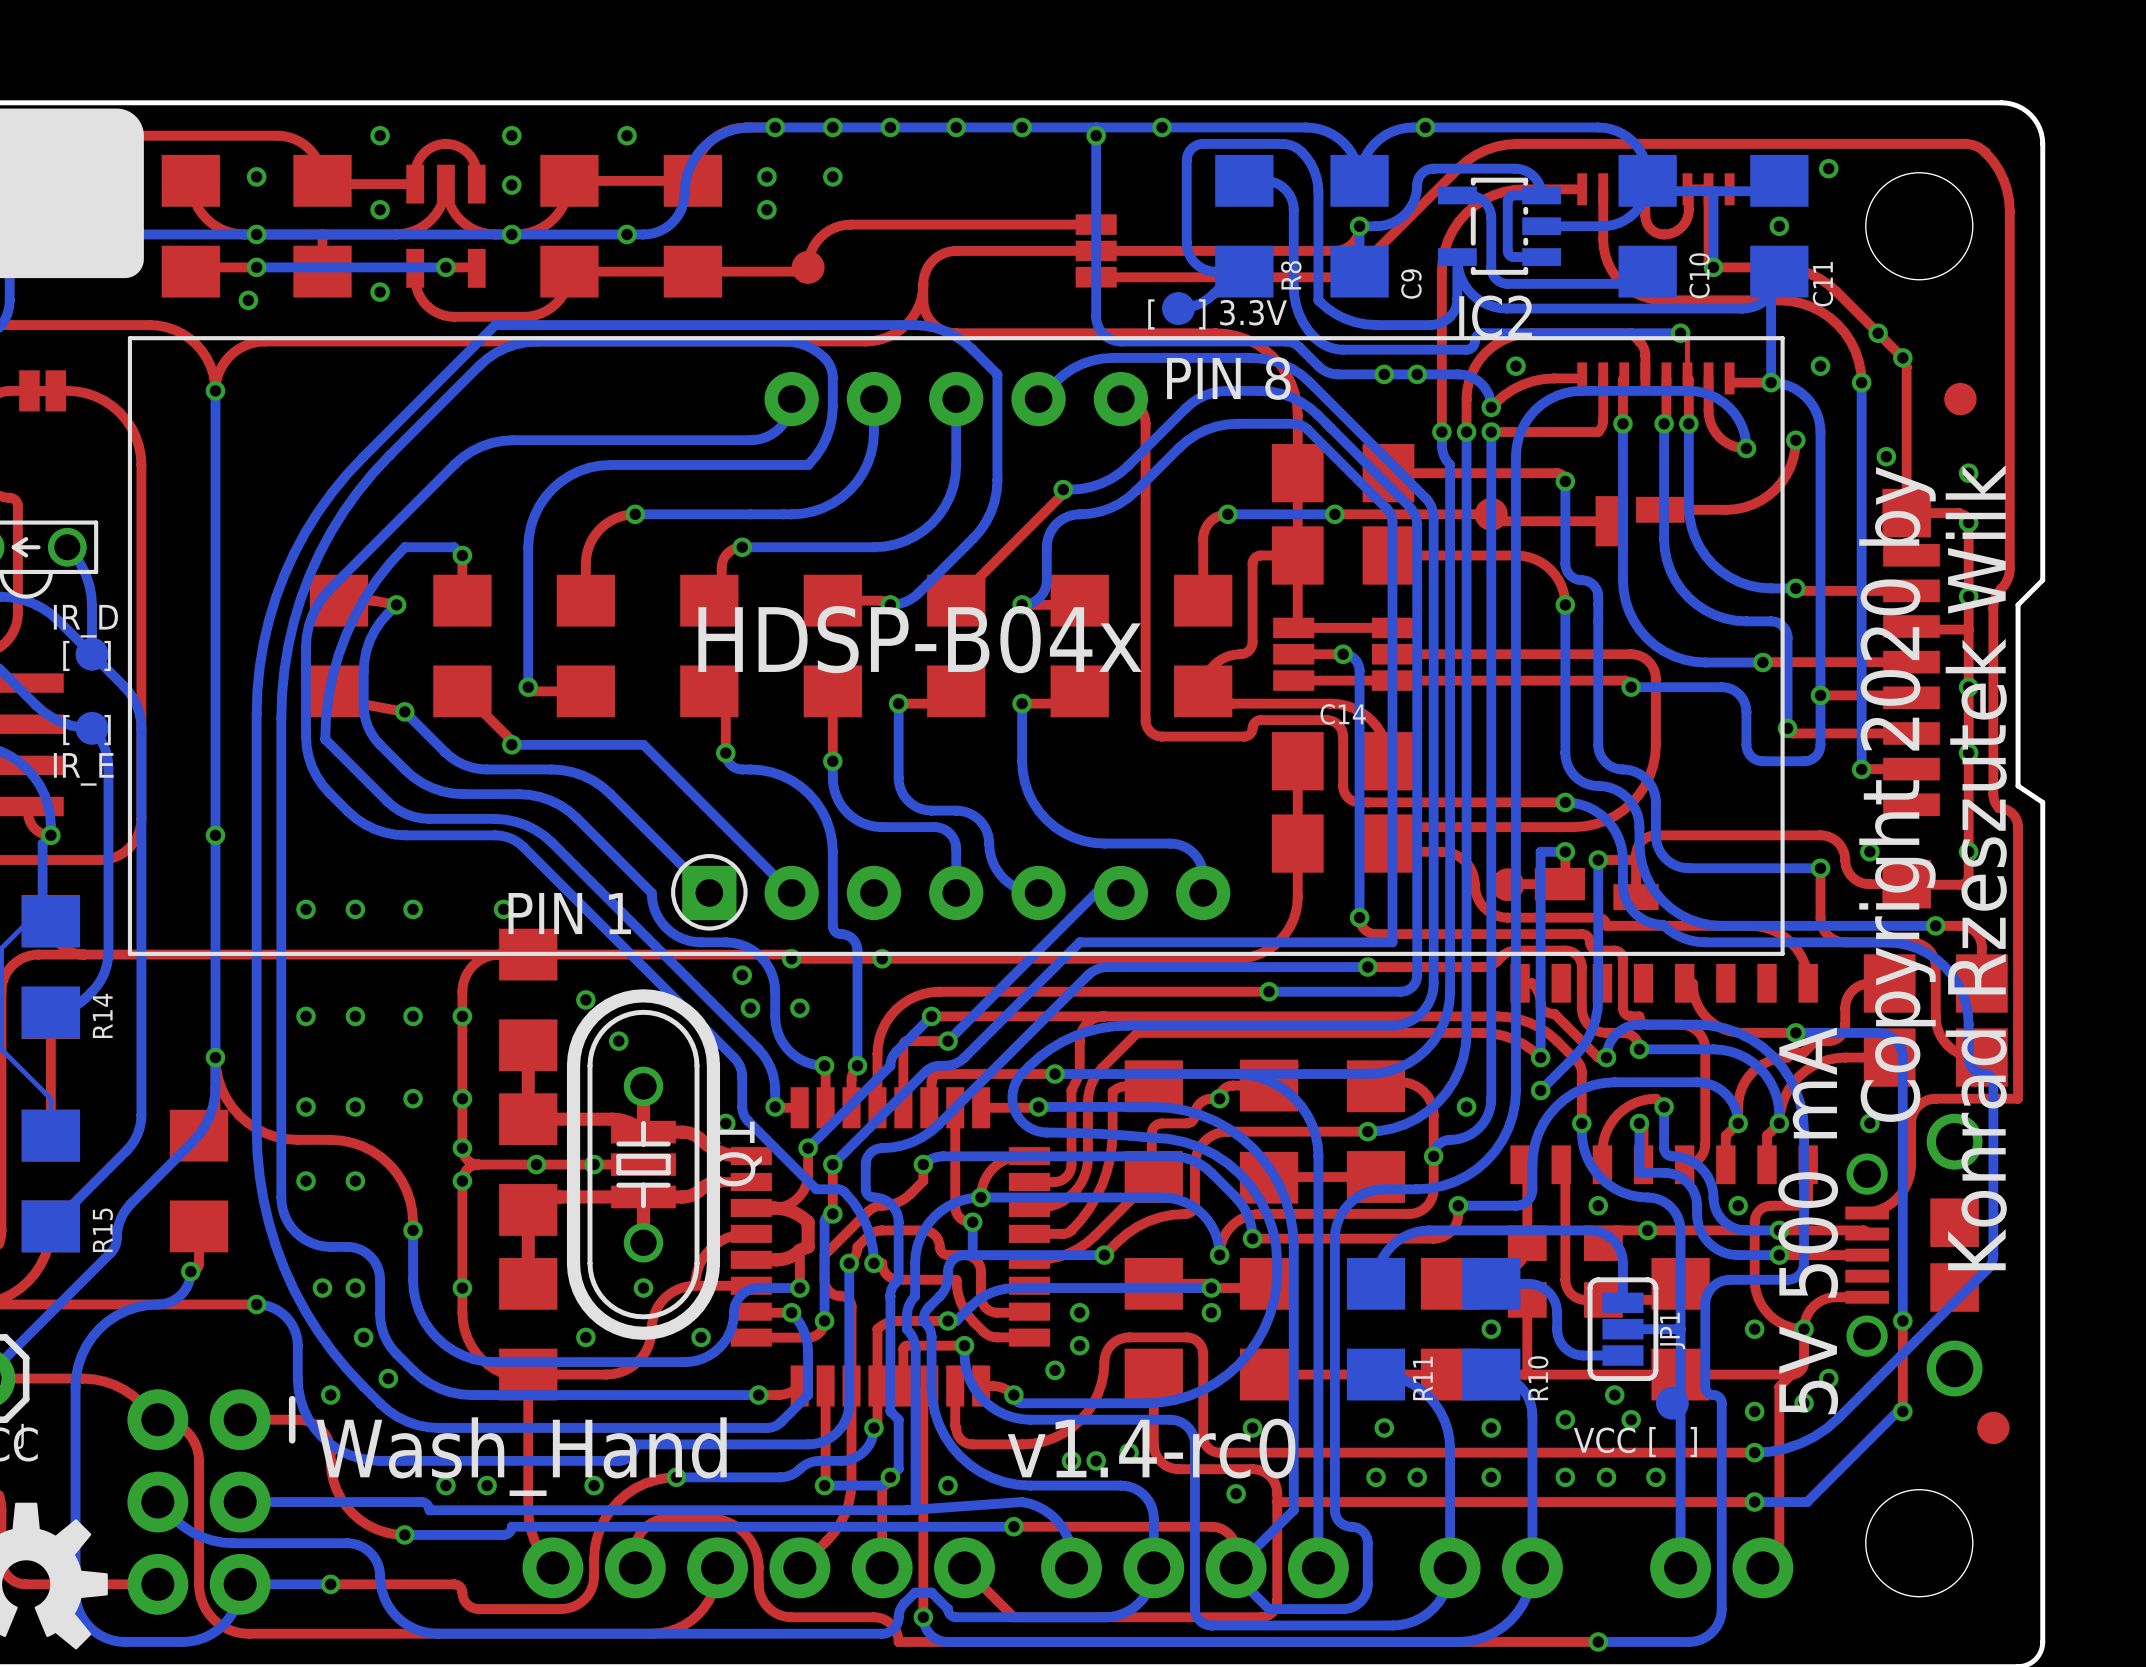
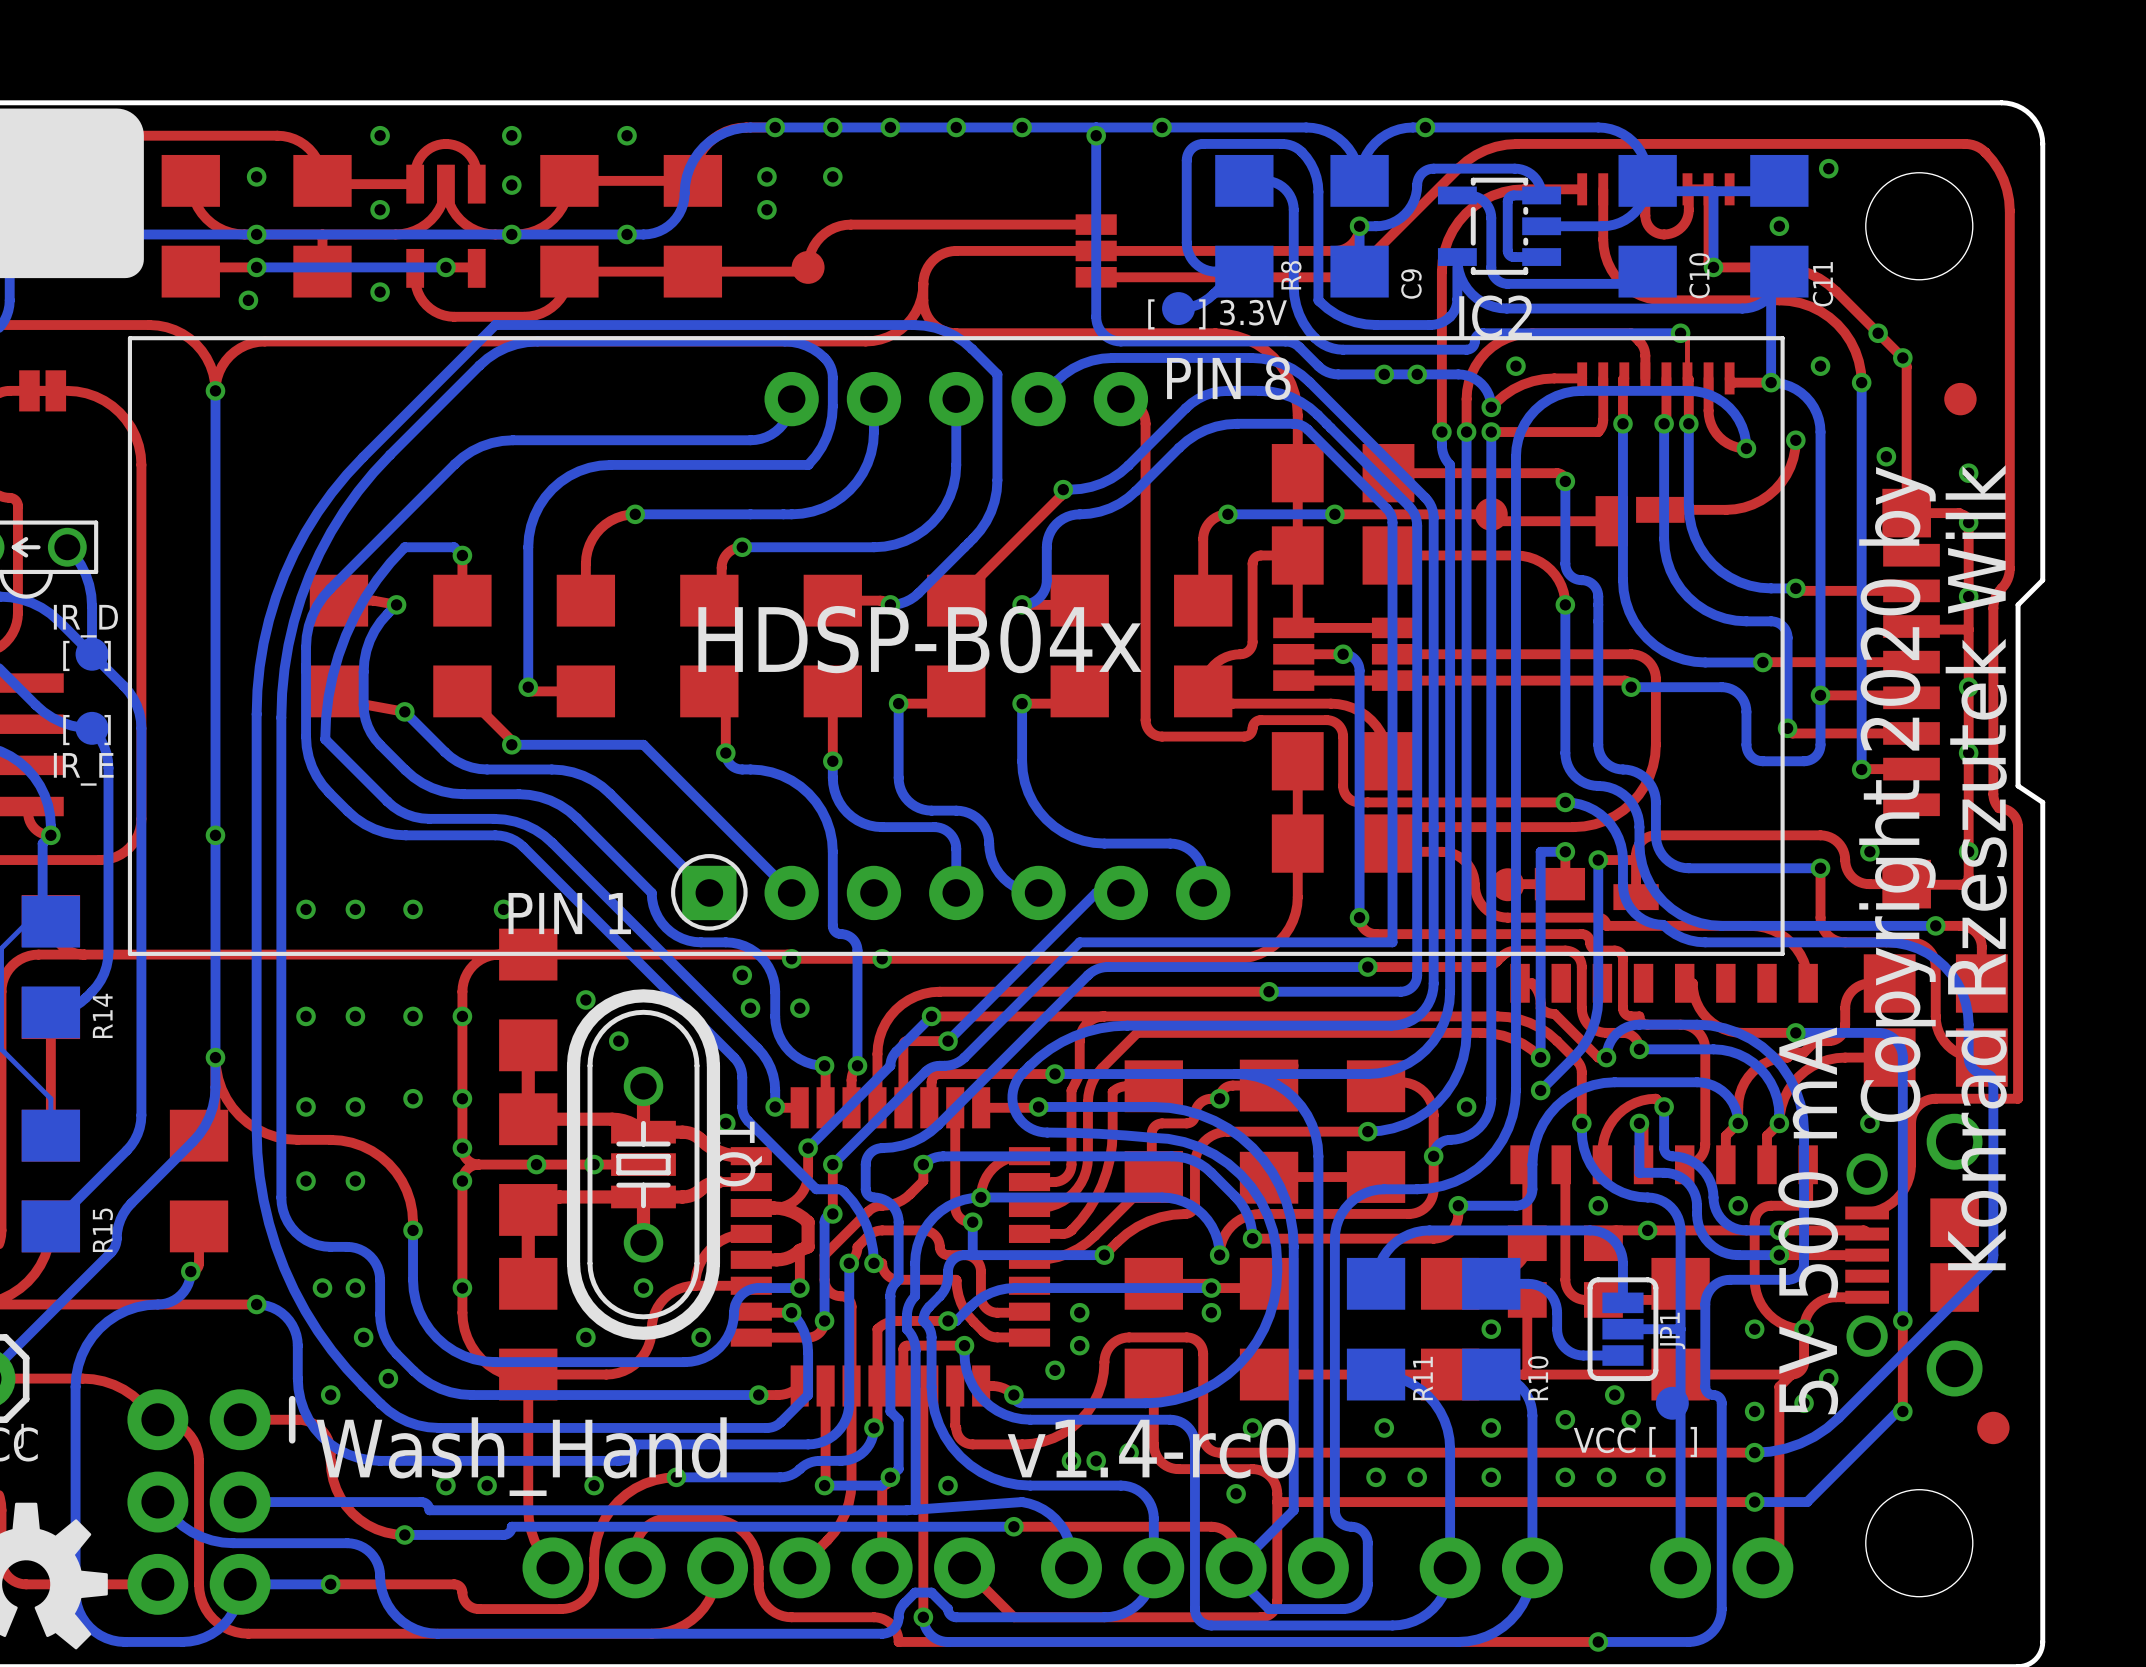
C14 name: C14 (1343, 714) -> none

